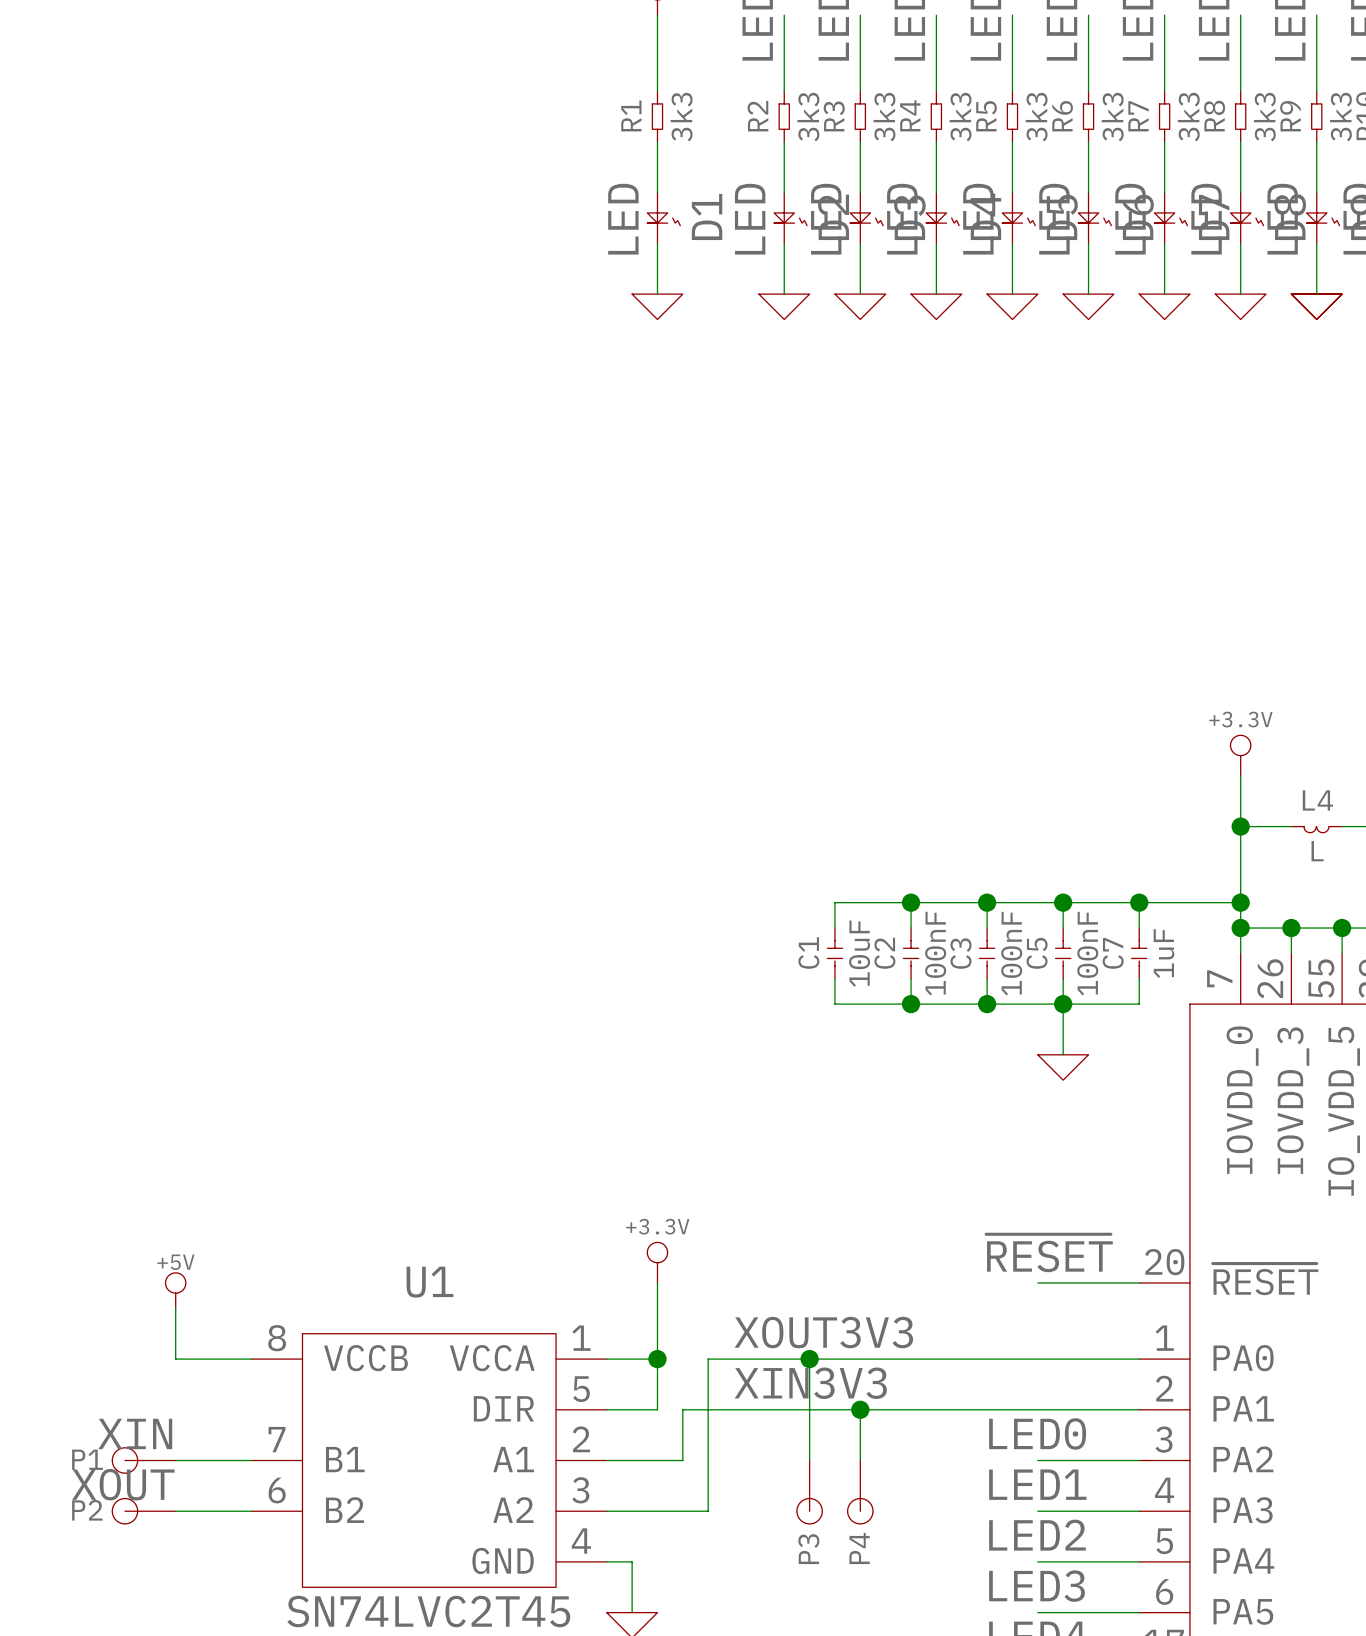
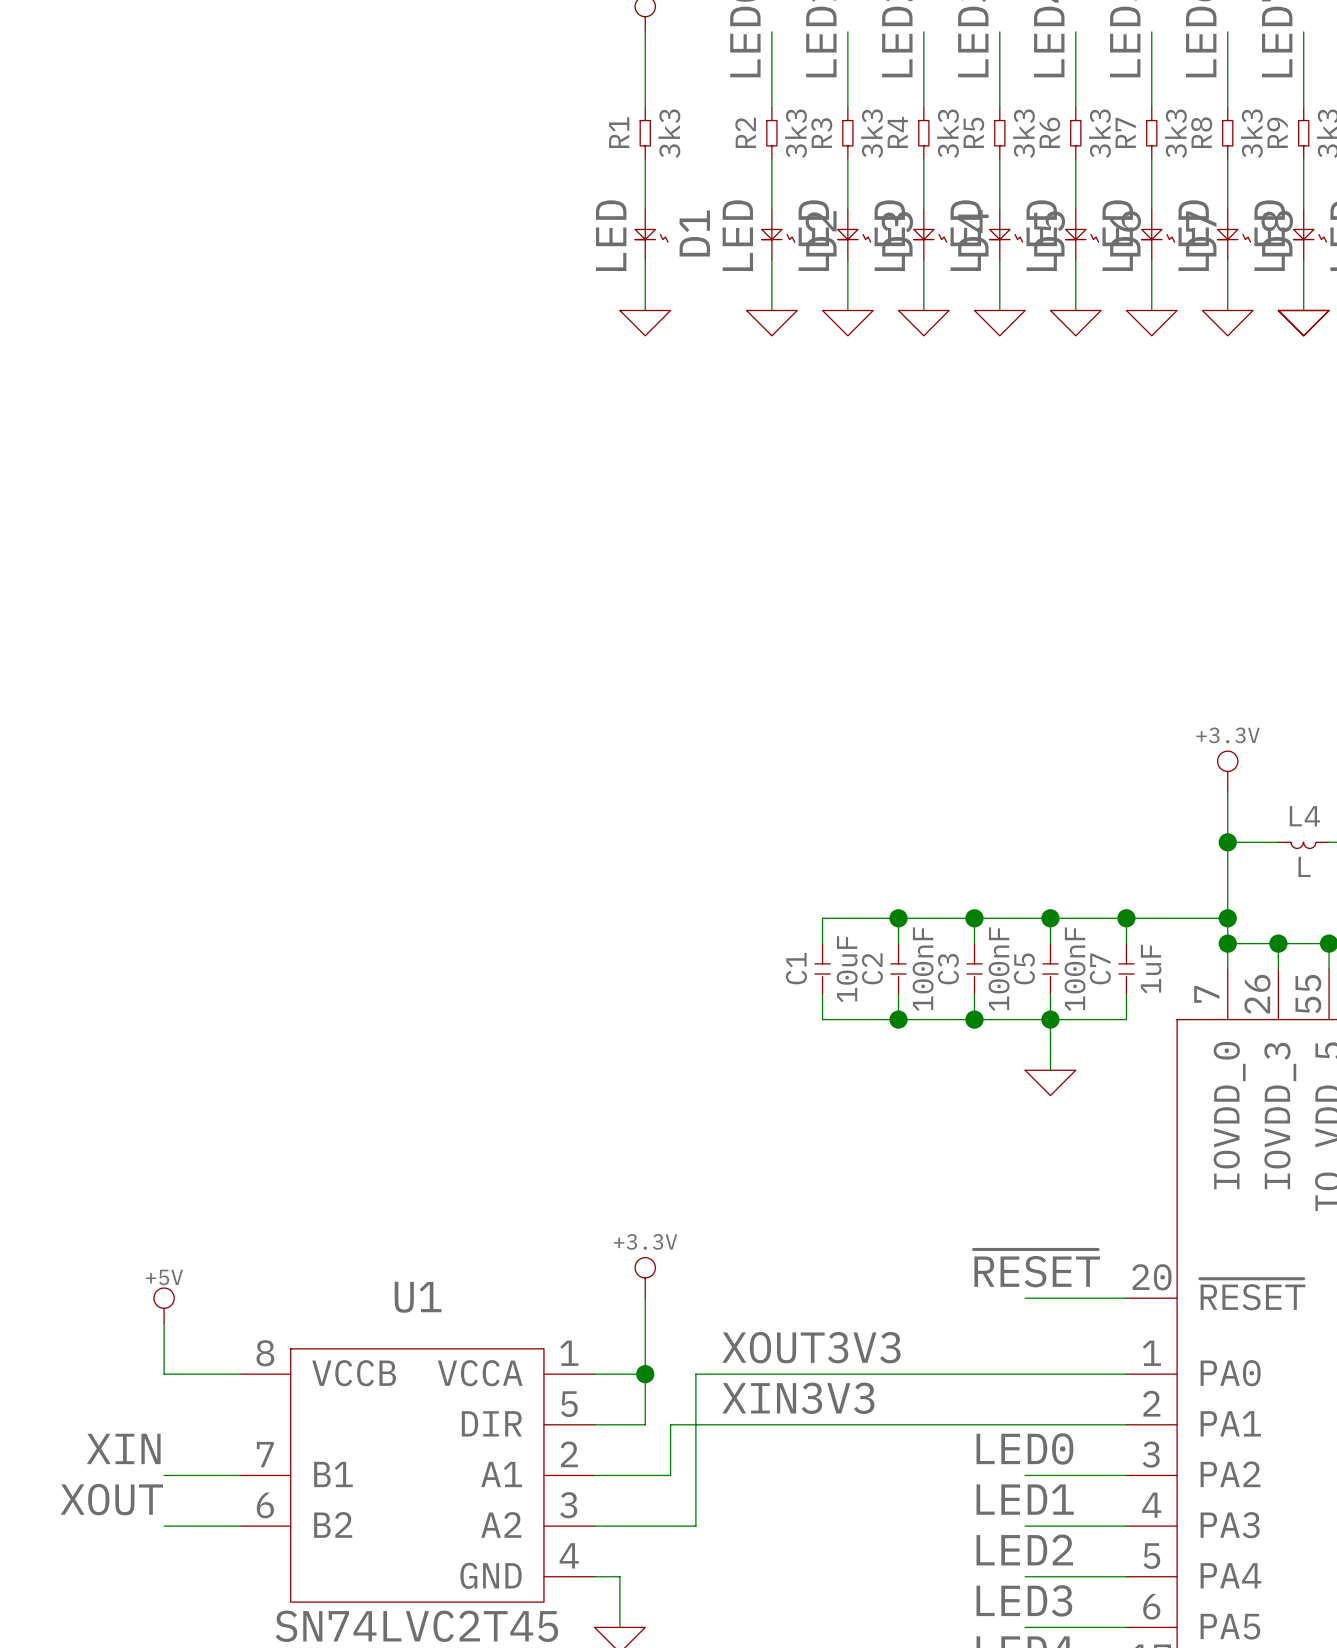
wire: (809, 1359) (809, 1460) -> none
junction: (809, 1359) -> none
wire: (860, 1409) (860, 1460) -> none
junction: (860, 1409) -> none
P1: (144, 1460) -> none
P3: (809, 1492) -> none
P4: (860, 1492) -> none
P2: (144, 1511) -> none

